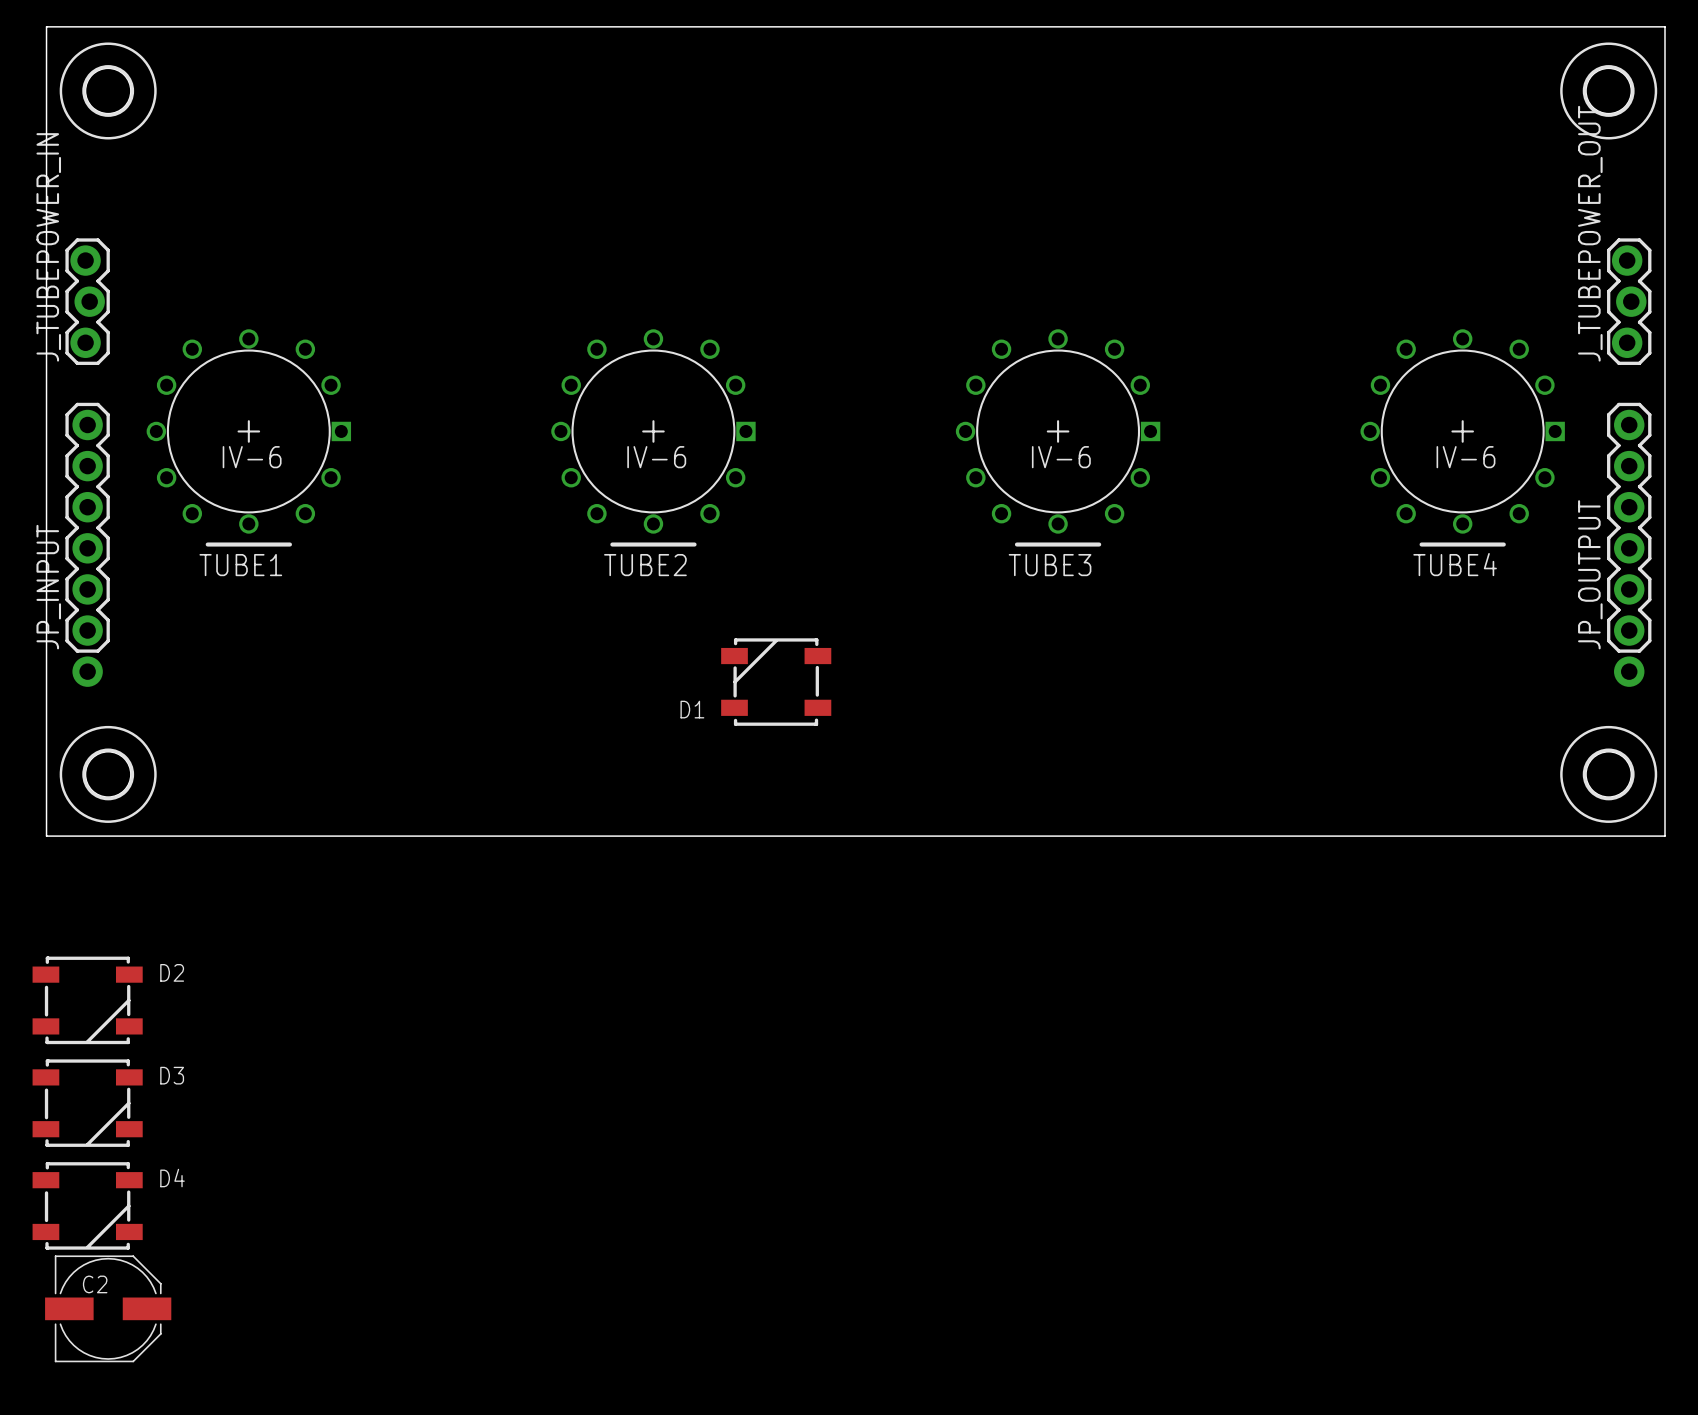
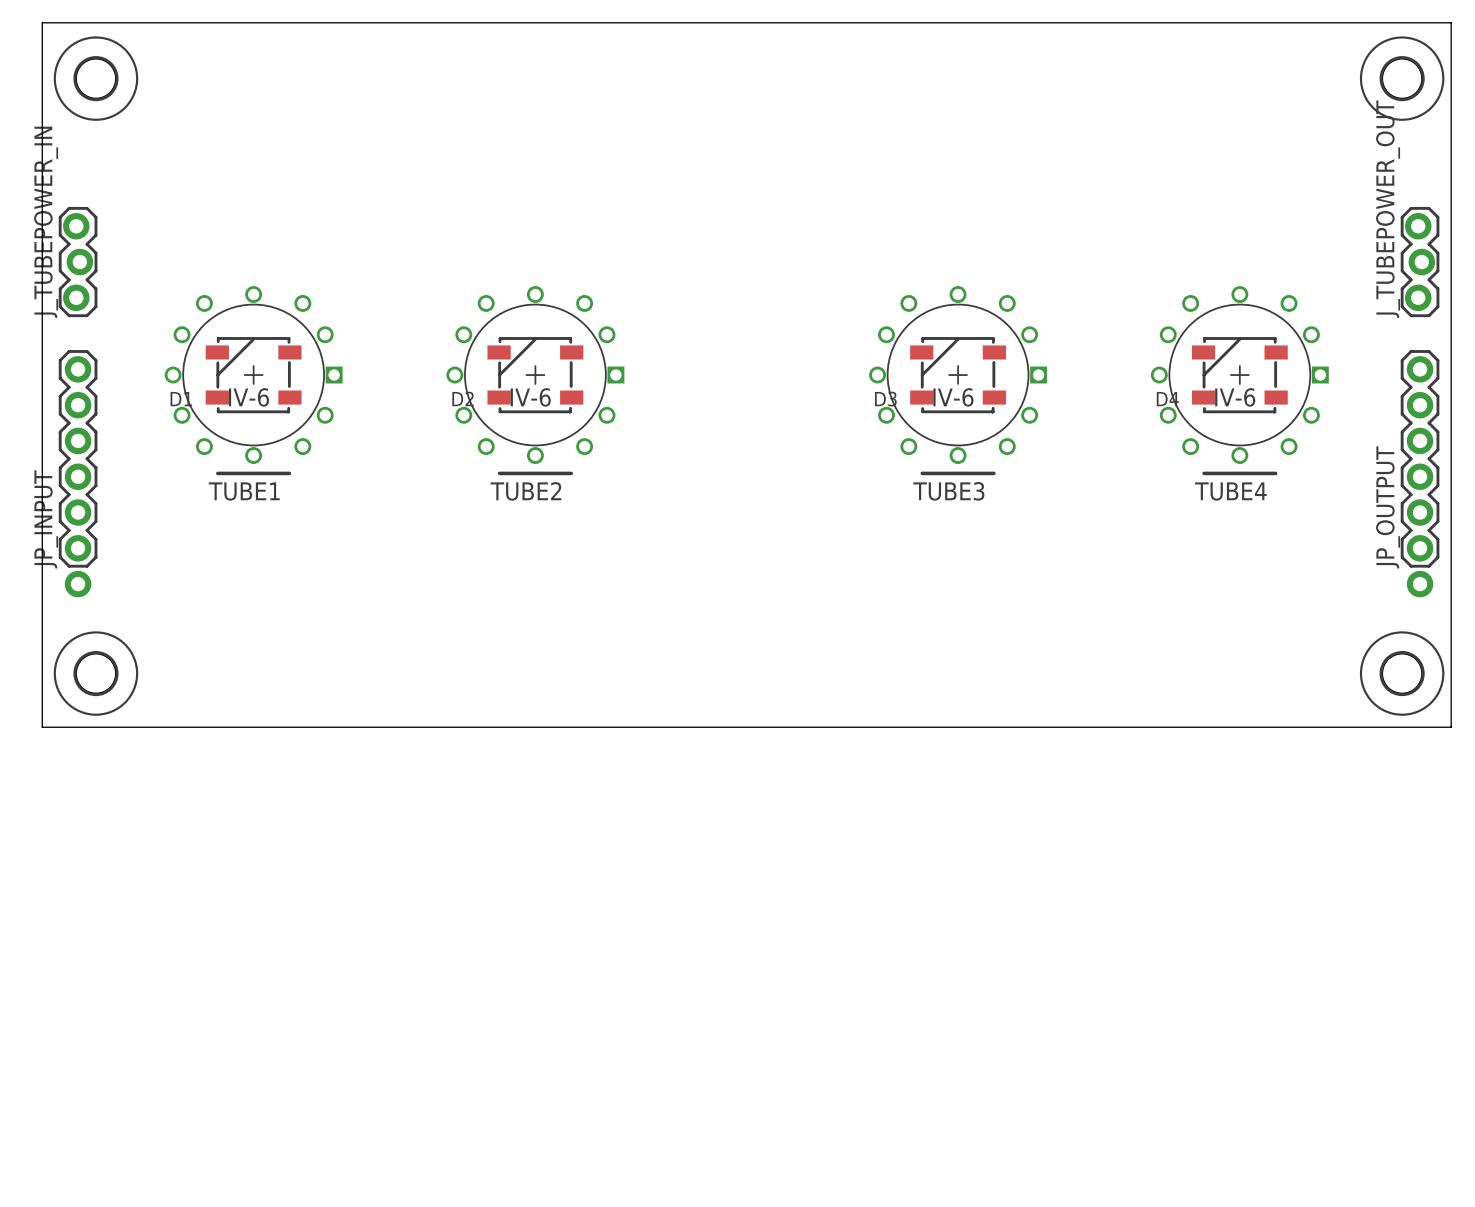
TUBE1 position: (248, 437) -> (253, 380)
TUBE2 position: (653, 437) -> (535, 380)
TUBE3 position: (1058, 437) -> (958, 380)
TUBE4 position: (1462, 437) -> (1239, 380)
D1 position: (776, 682) -> (253, 375)
D2 rotation: 0° (87, 1000) -> 180° (535, 375)
D2 position: (87, 1000) -> (535, 375)
D3 rotation: 0° (87, 1103) -> 180° (958, 375)
D3 position: (87, 1103) -> (958, 375)
D4 rotation: 0° (87, 1205) -> 180° (1239, 375)
D4 position: (87, 1205) -> (1239, 375)
C2: (108, 1308) -> none

